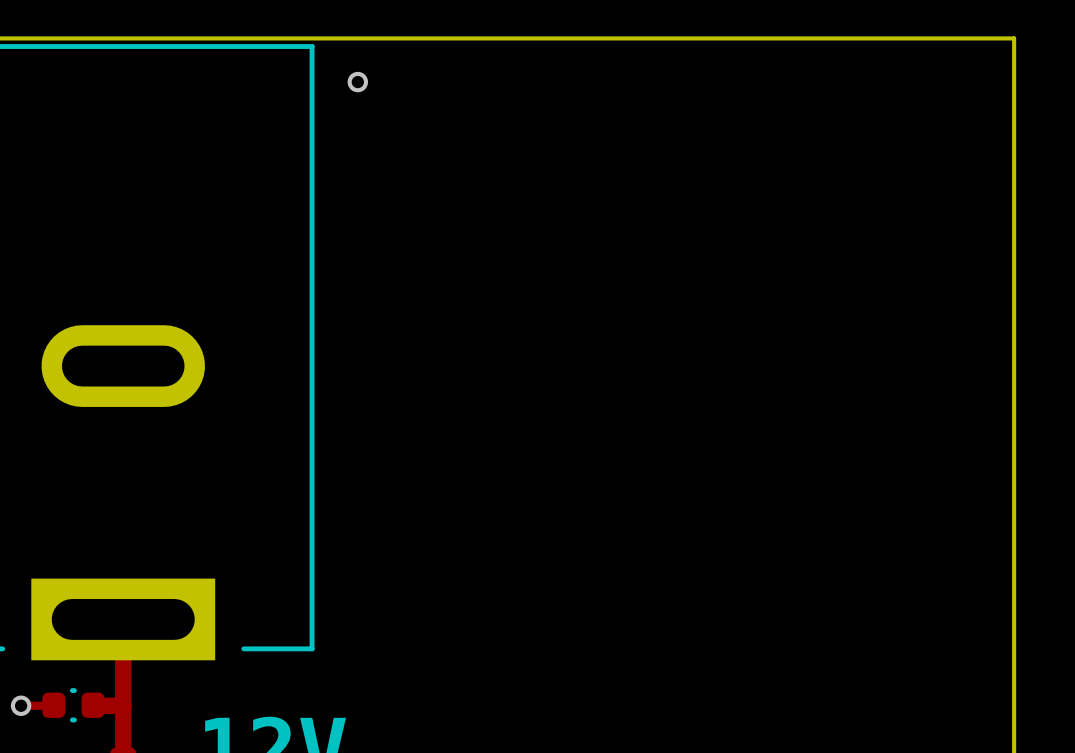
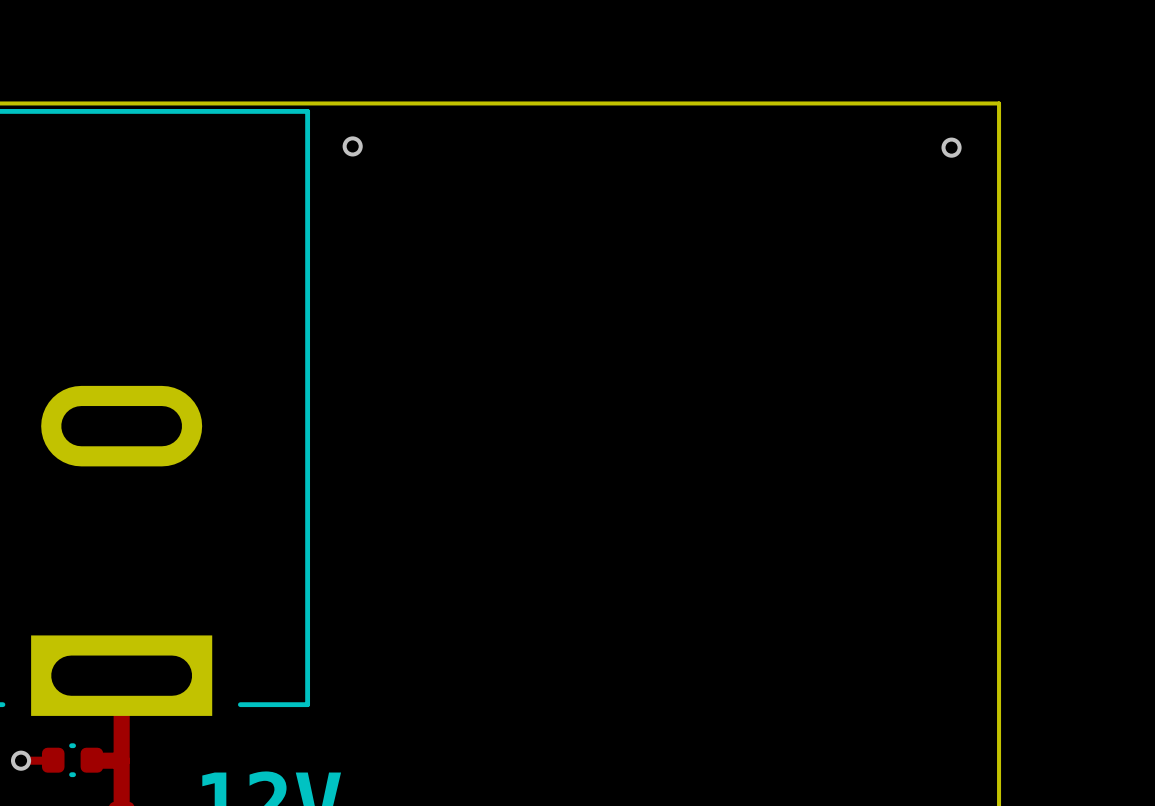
via: none -> (951, 147)

